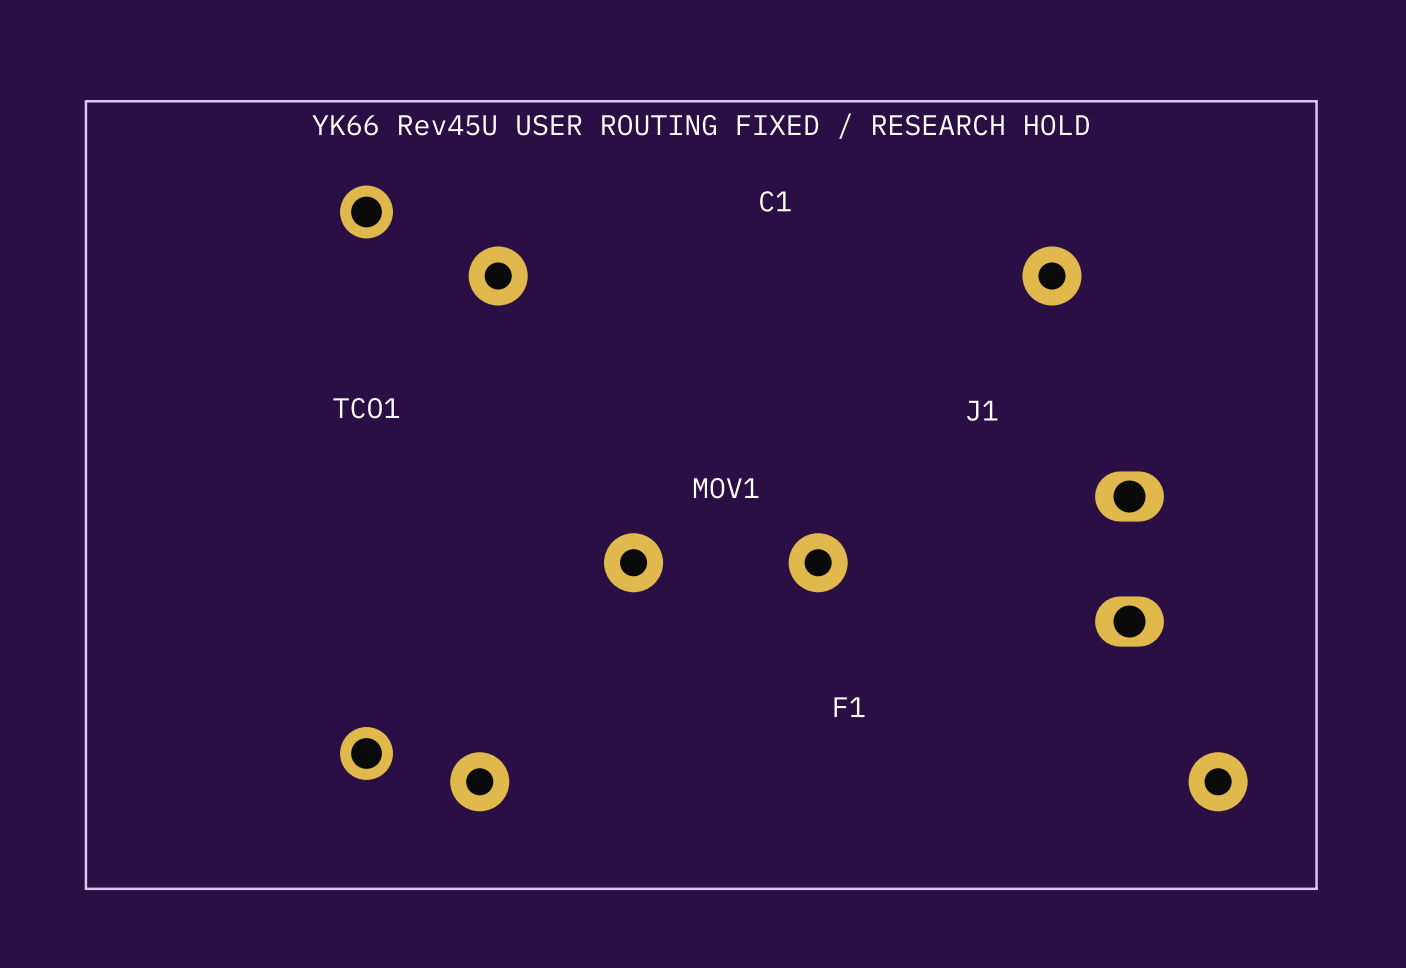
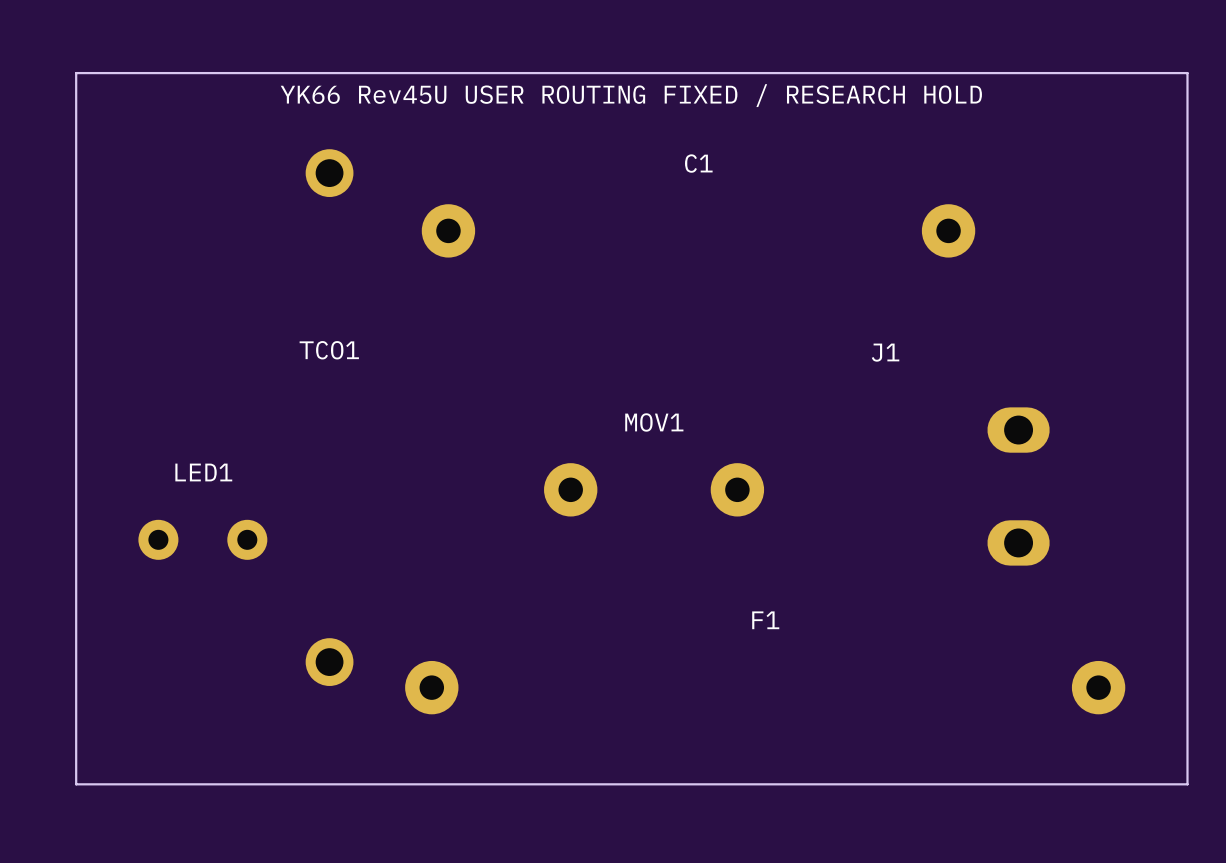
LED1: none -> (202, 539)

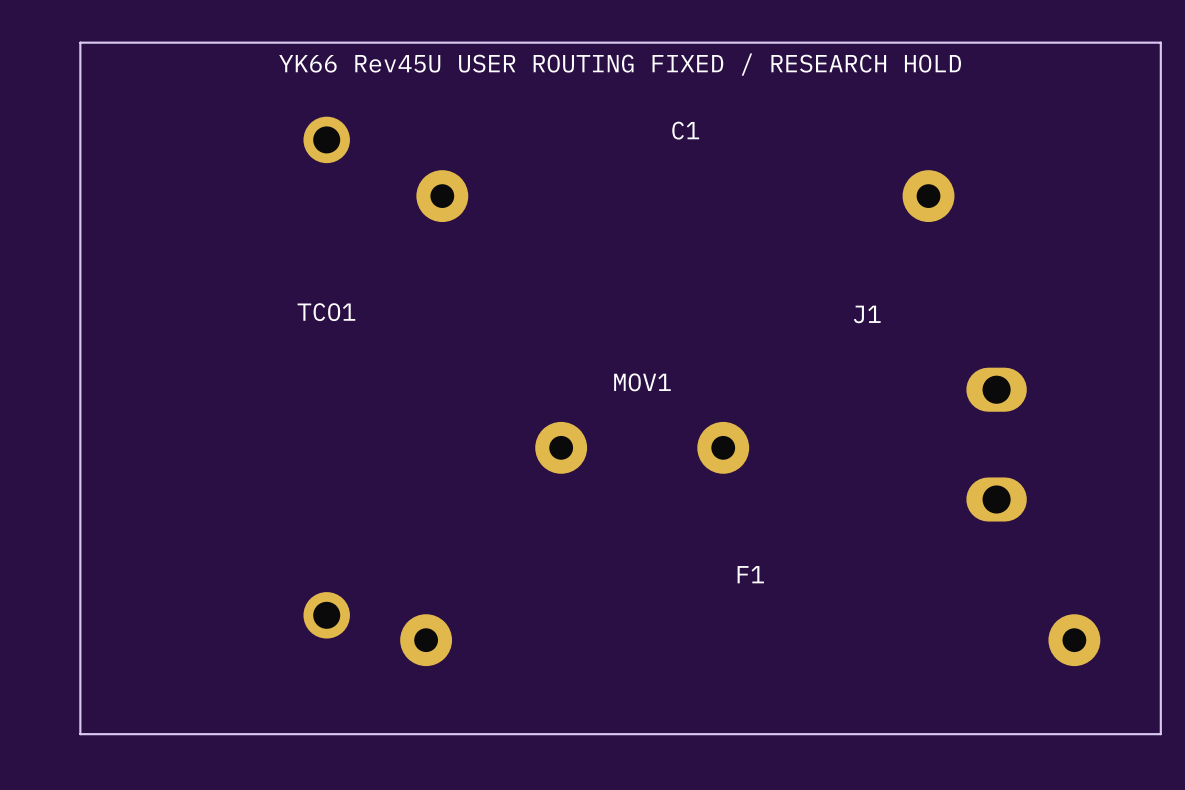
LED1: (202, 539) -> none

